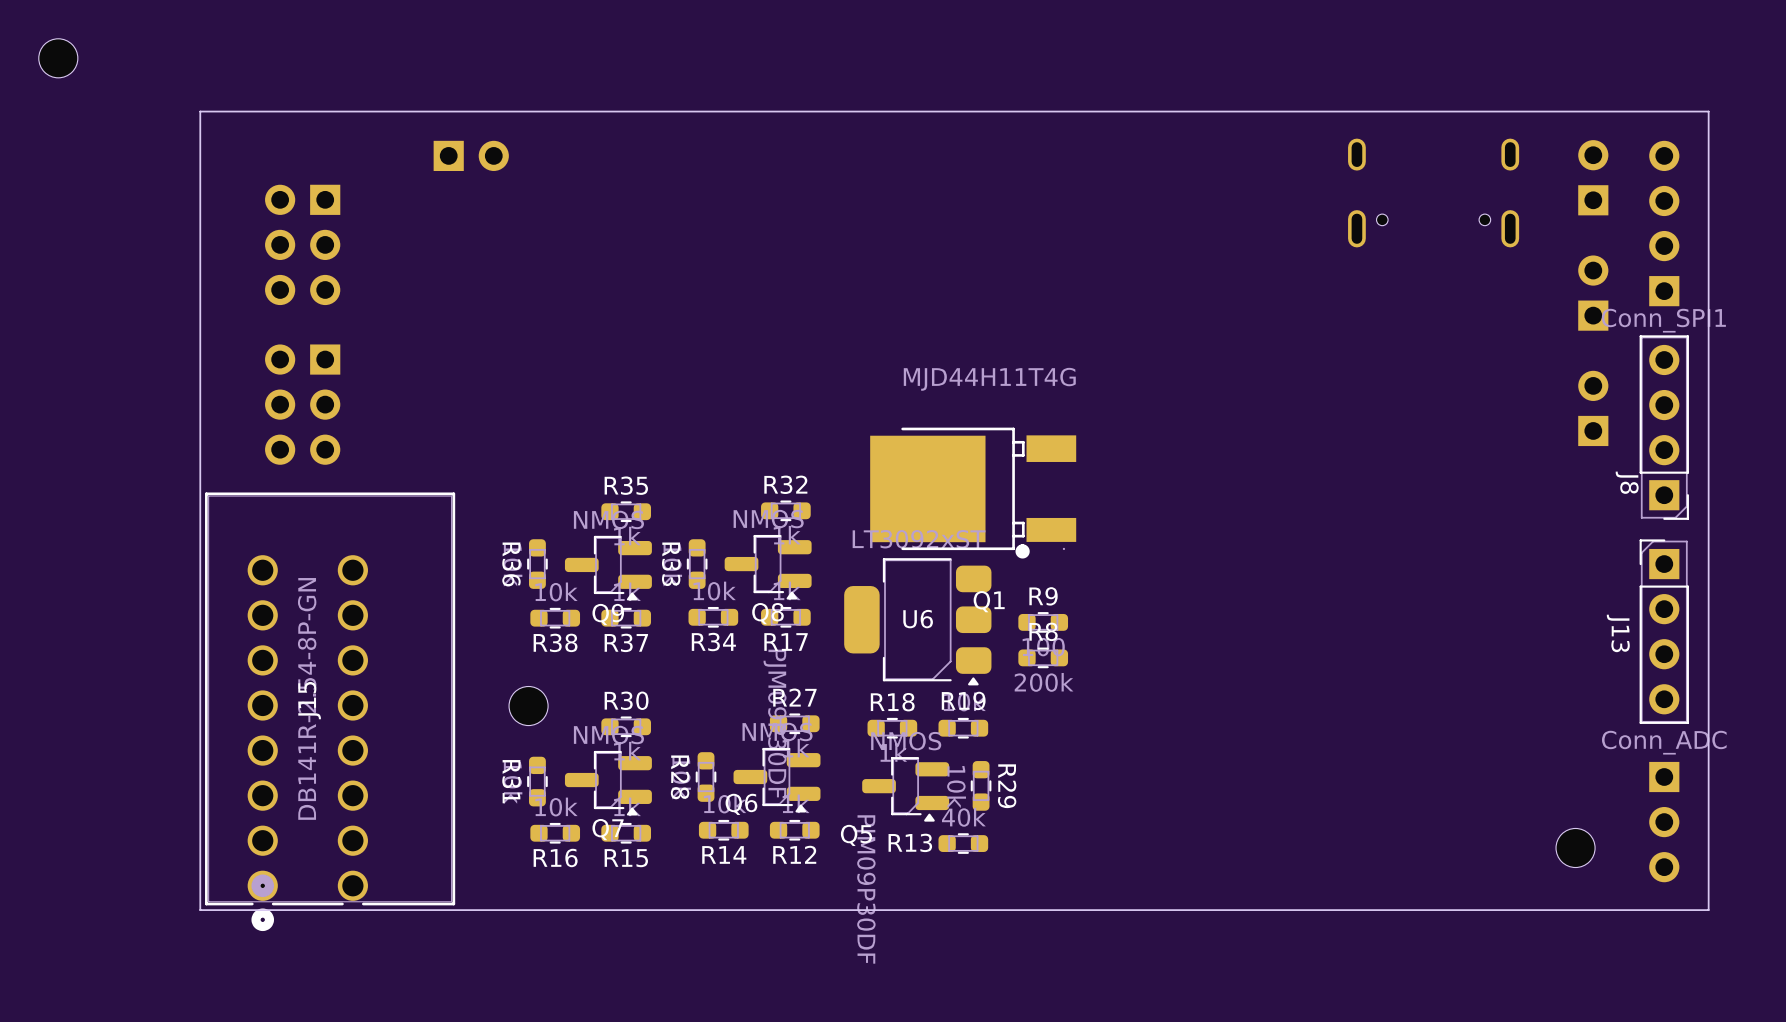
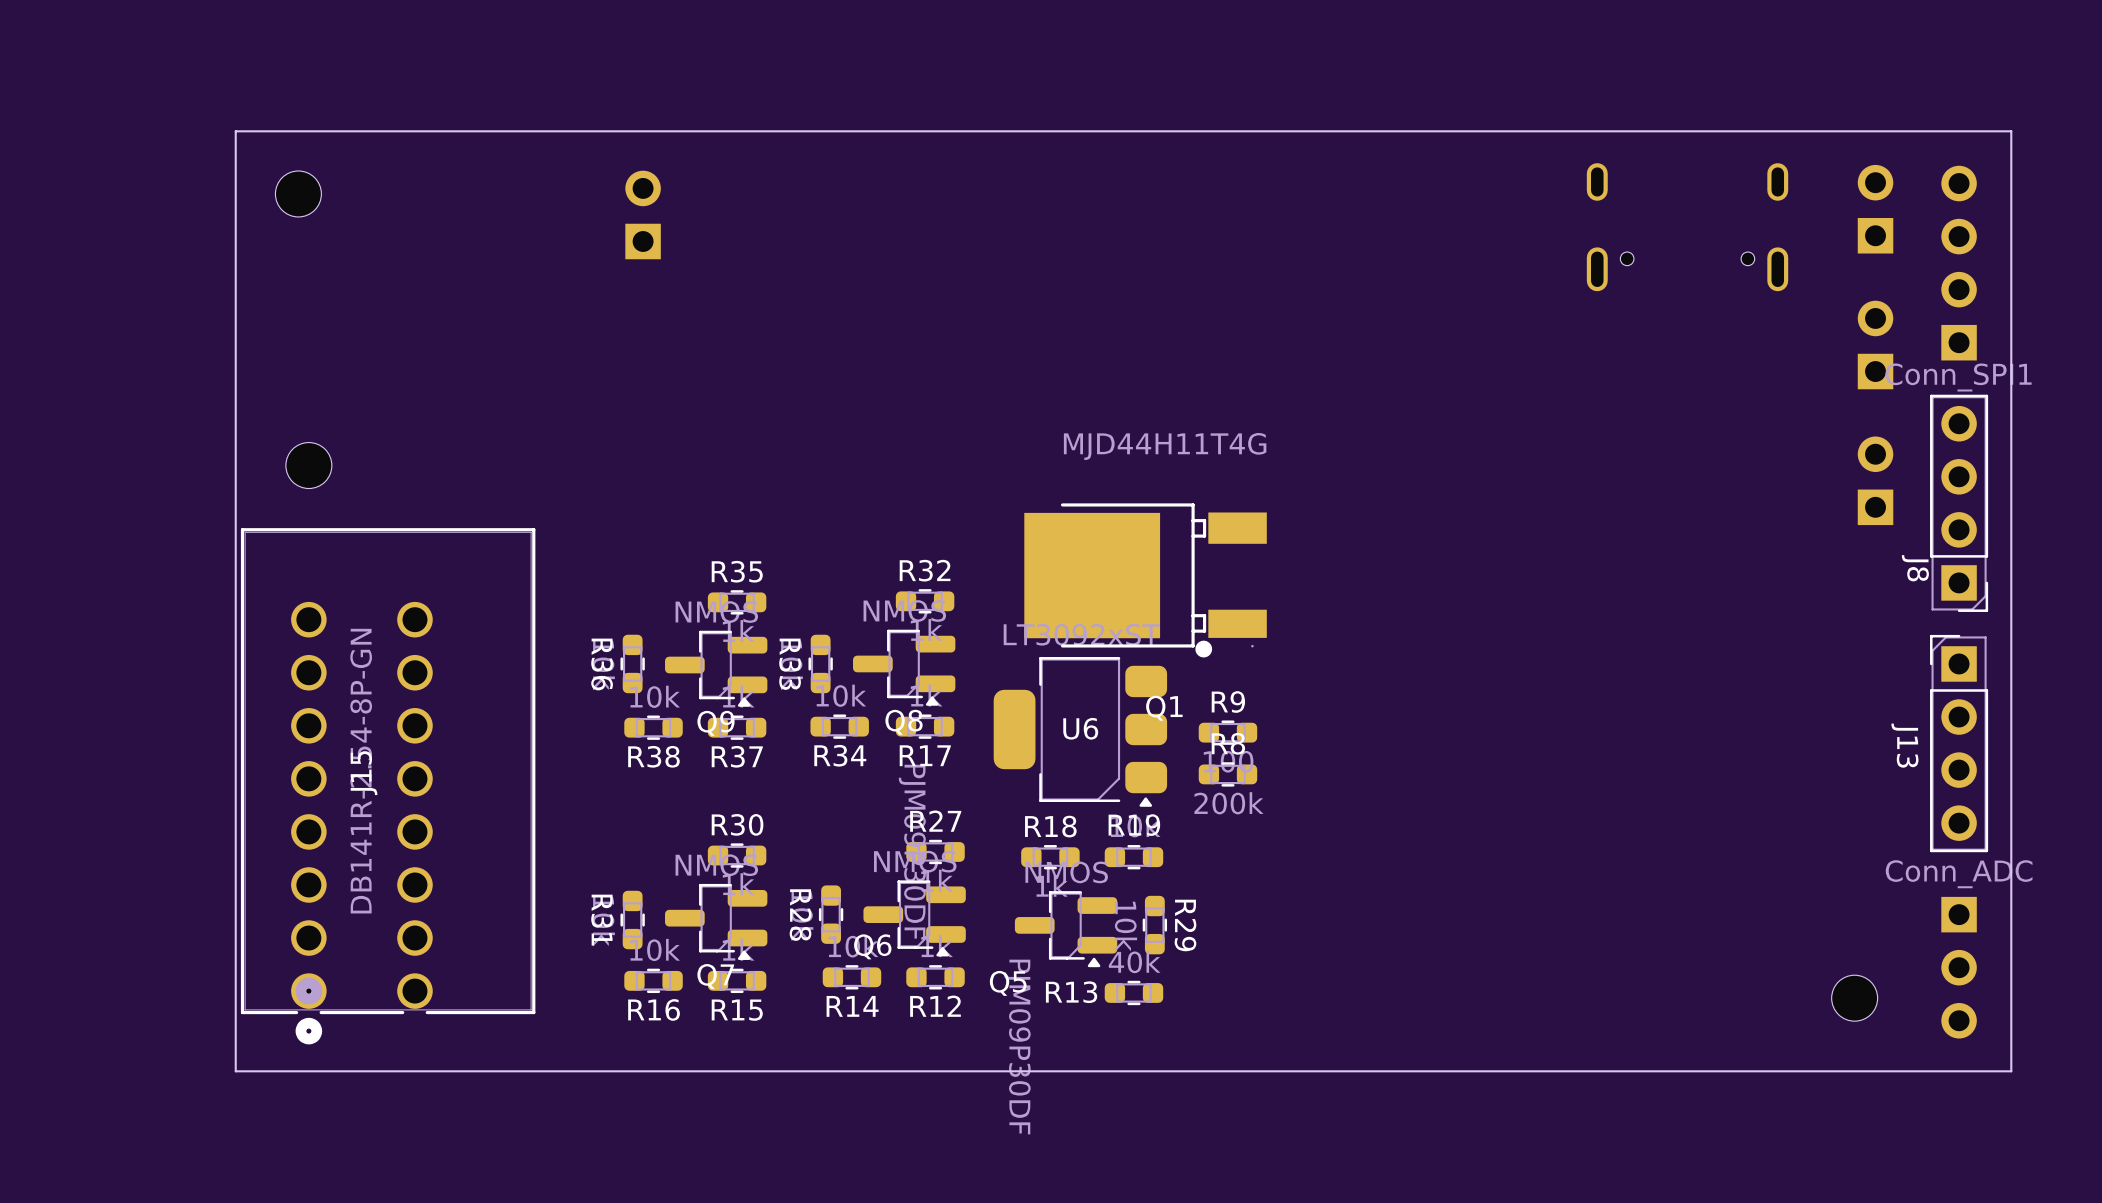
part: (58, 58) -> none
part rotation: 0° (471, 155) -> 90° counterclockwise (643, 214)
part position: (471, 155) -> (643, 214)
part: none -> (298, 193)
part: (302, 244) -> none
part: none -> (308, 465)
part: (302, 404) -> none
part: (528, 706) -> none
J15 position: (330, 711) -> (388, 786)

